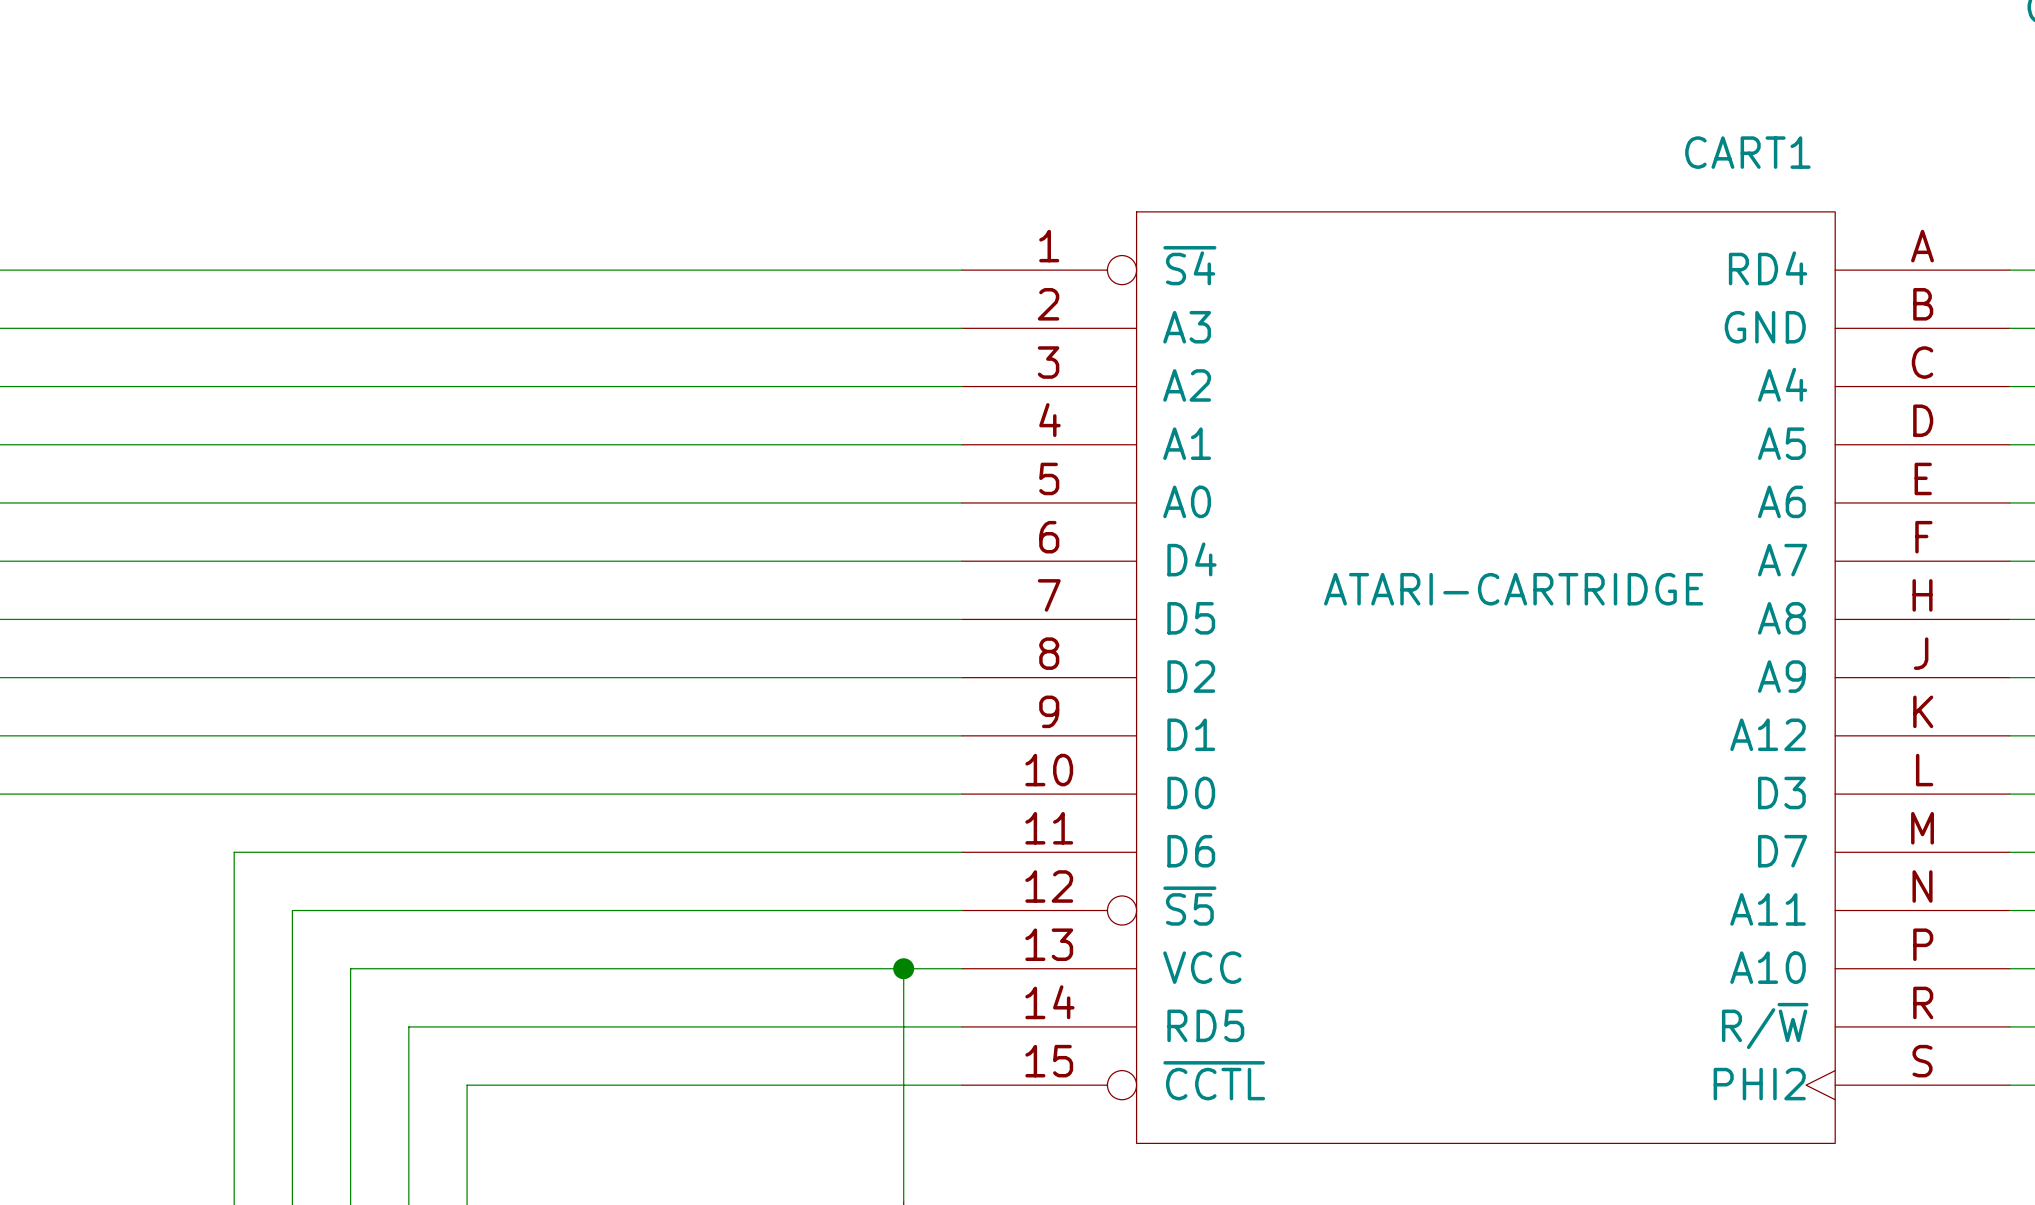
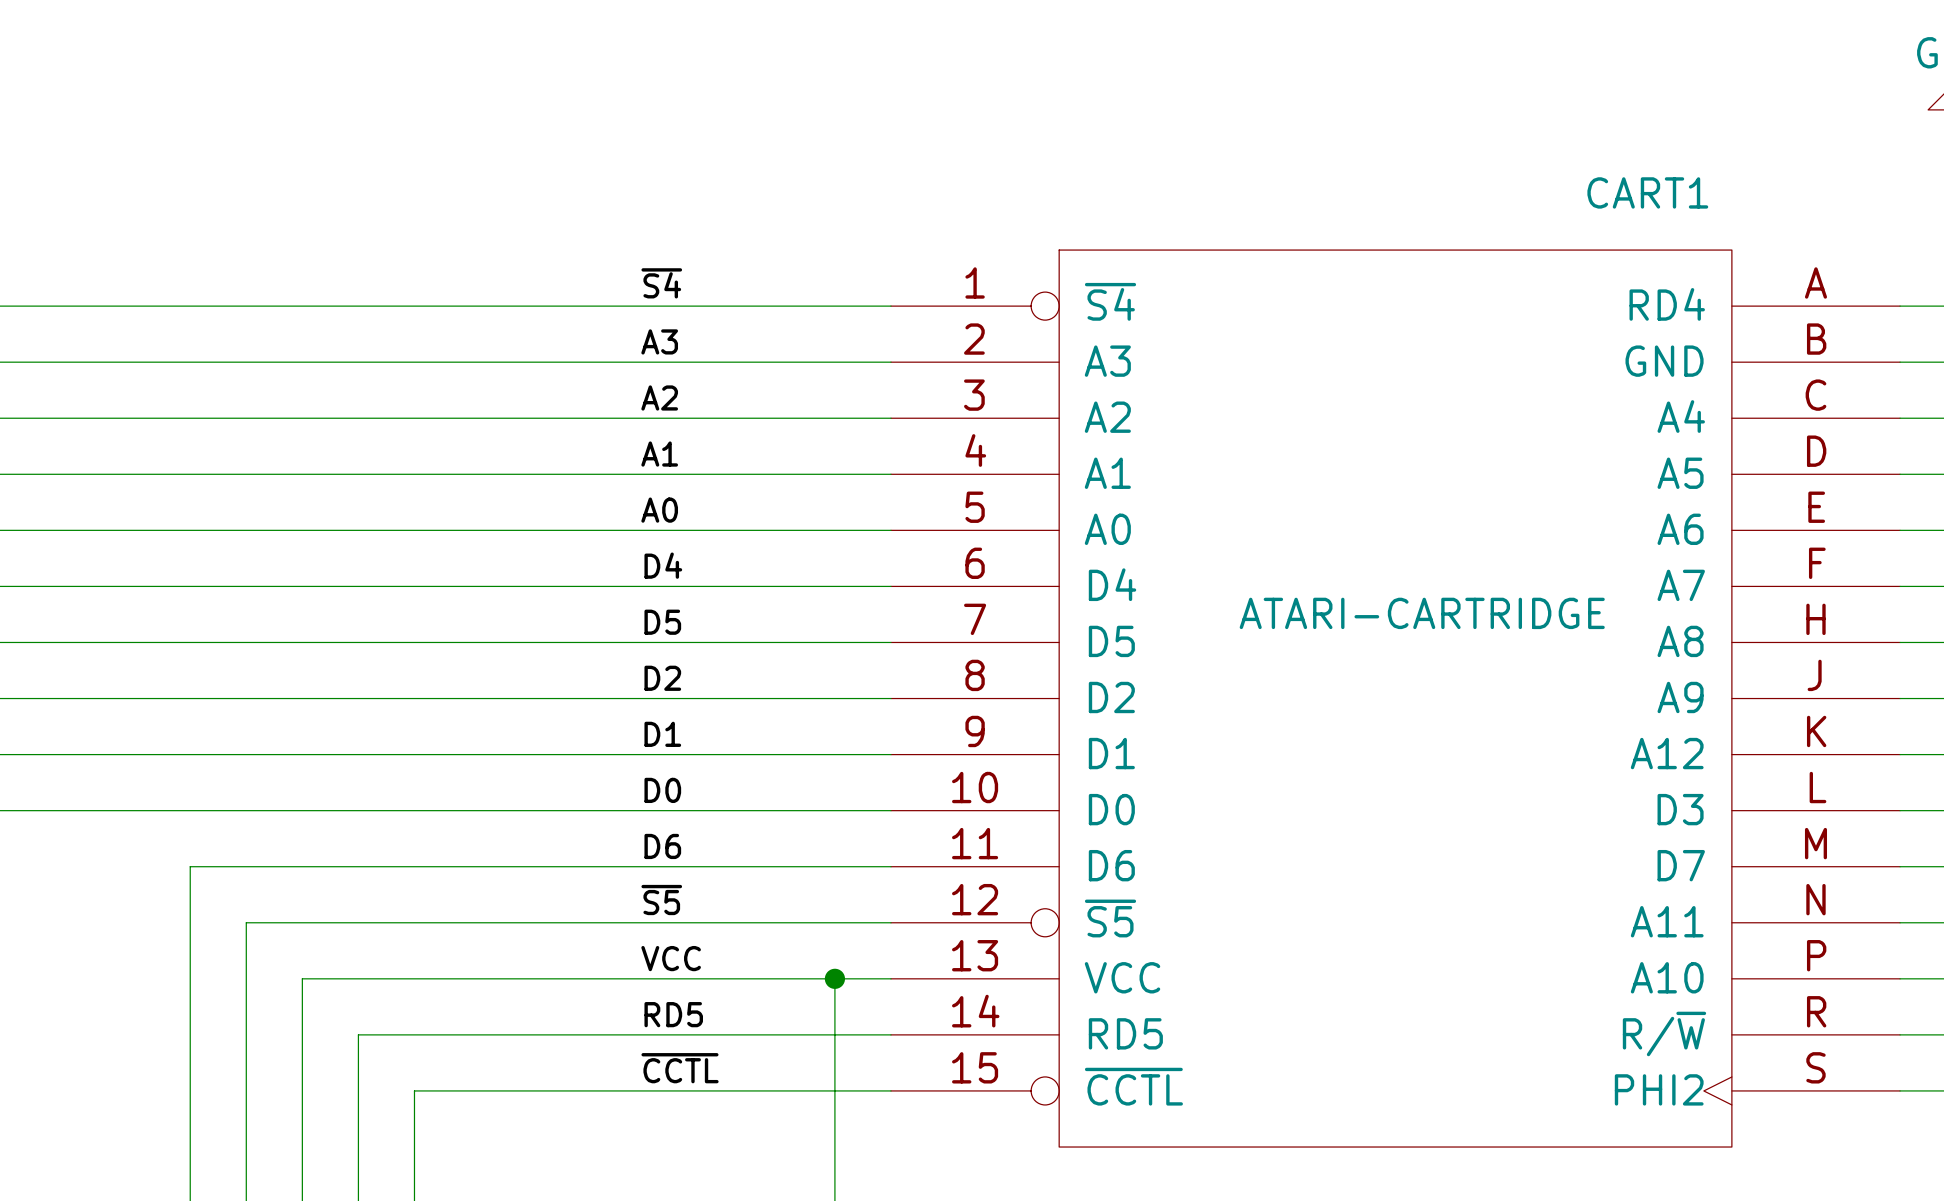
label: none -> ~{S4} (661, 283)
label: none -> A3 (659, 341)
label: none -> A2 (659, 397)
label: none -> A1 (659, 454)
label: none -> A0 (659, 510)
label: none -> D4 (663, 565)
label: none -> D5 (662, 622)
label: none -> D2 (662, 678)
label: none -> D1 (662, 734)
label: none -> D0 (662, 790)
label: none -> D6 (662, 846)
label: none -> ~{S5} (661, 900)
label: none -> VCC (671, 958)
label: none -> RD5 (673, 1014)
label: none -> ~{CCTL} (680, 1068)

